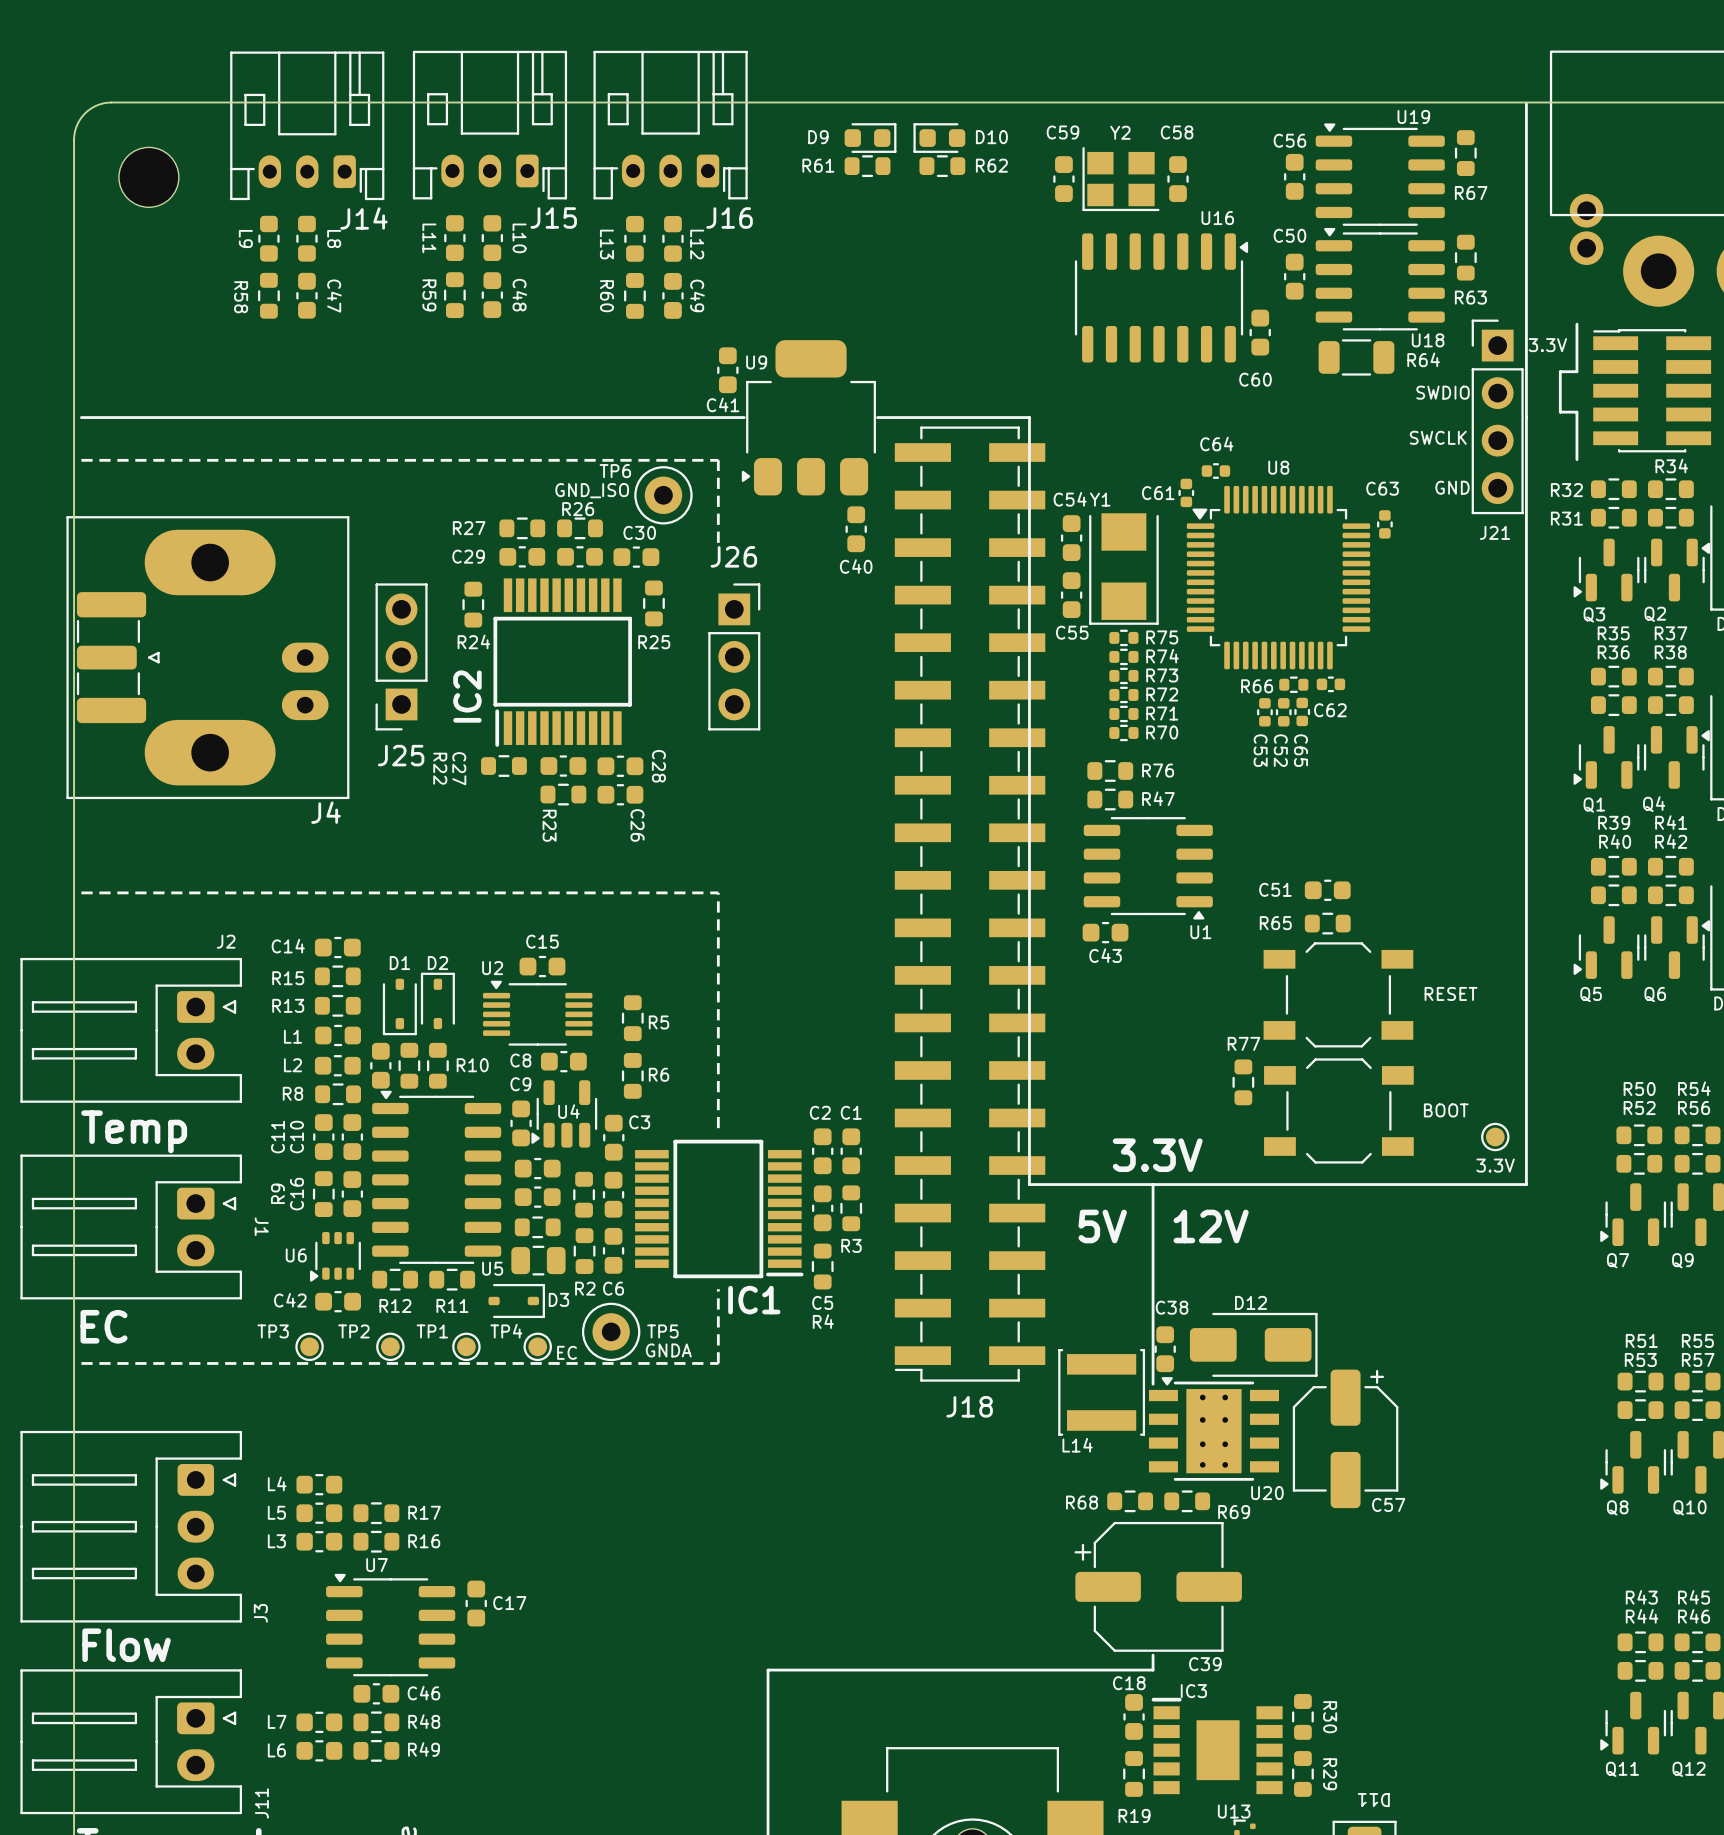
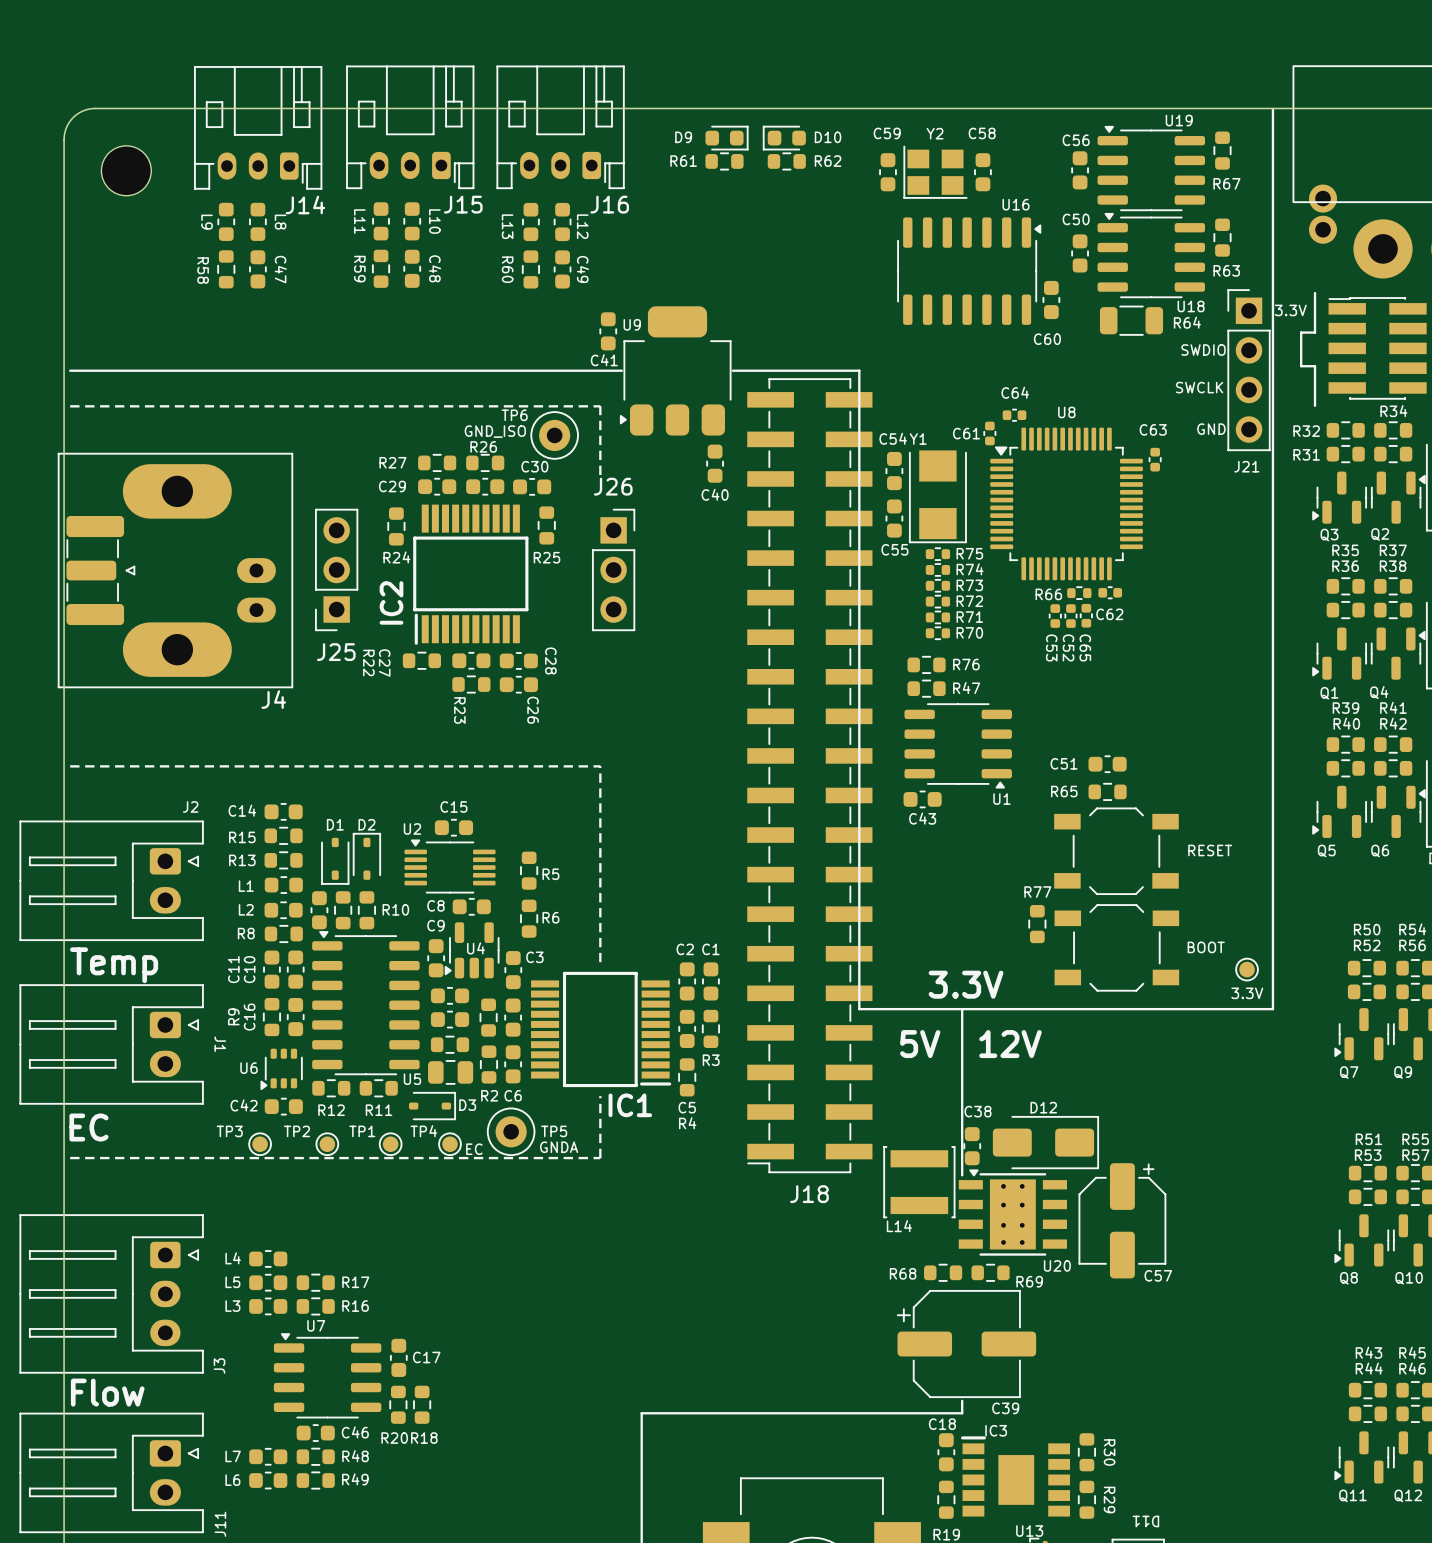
R20: none -> (398, 1404)
R18: none -> (422, 1404)

